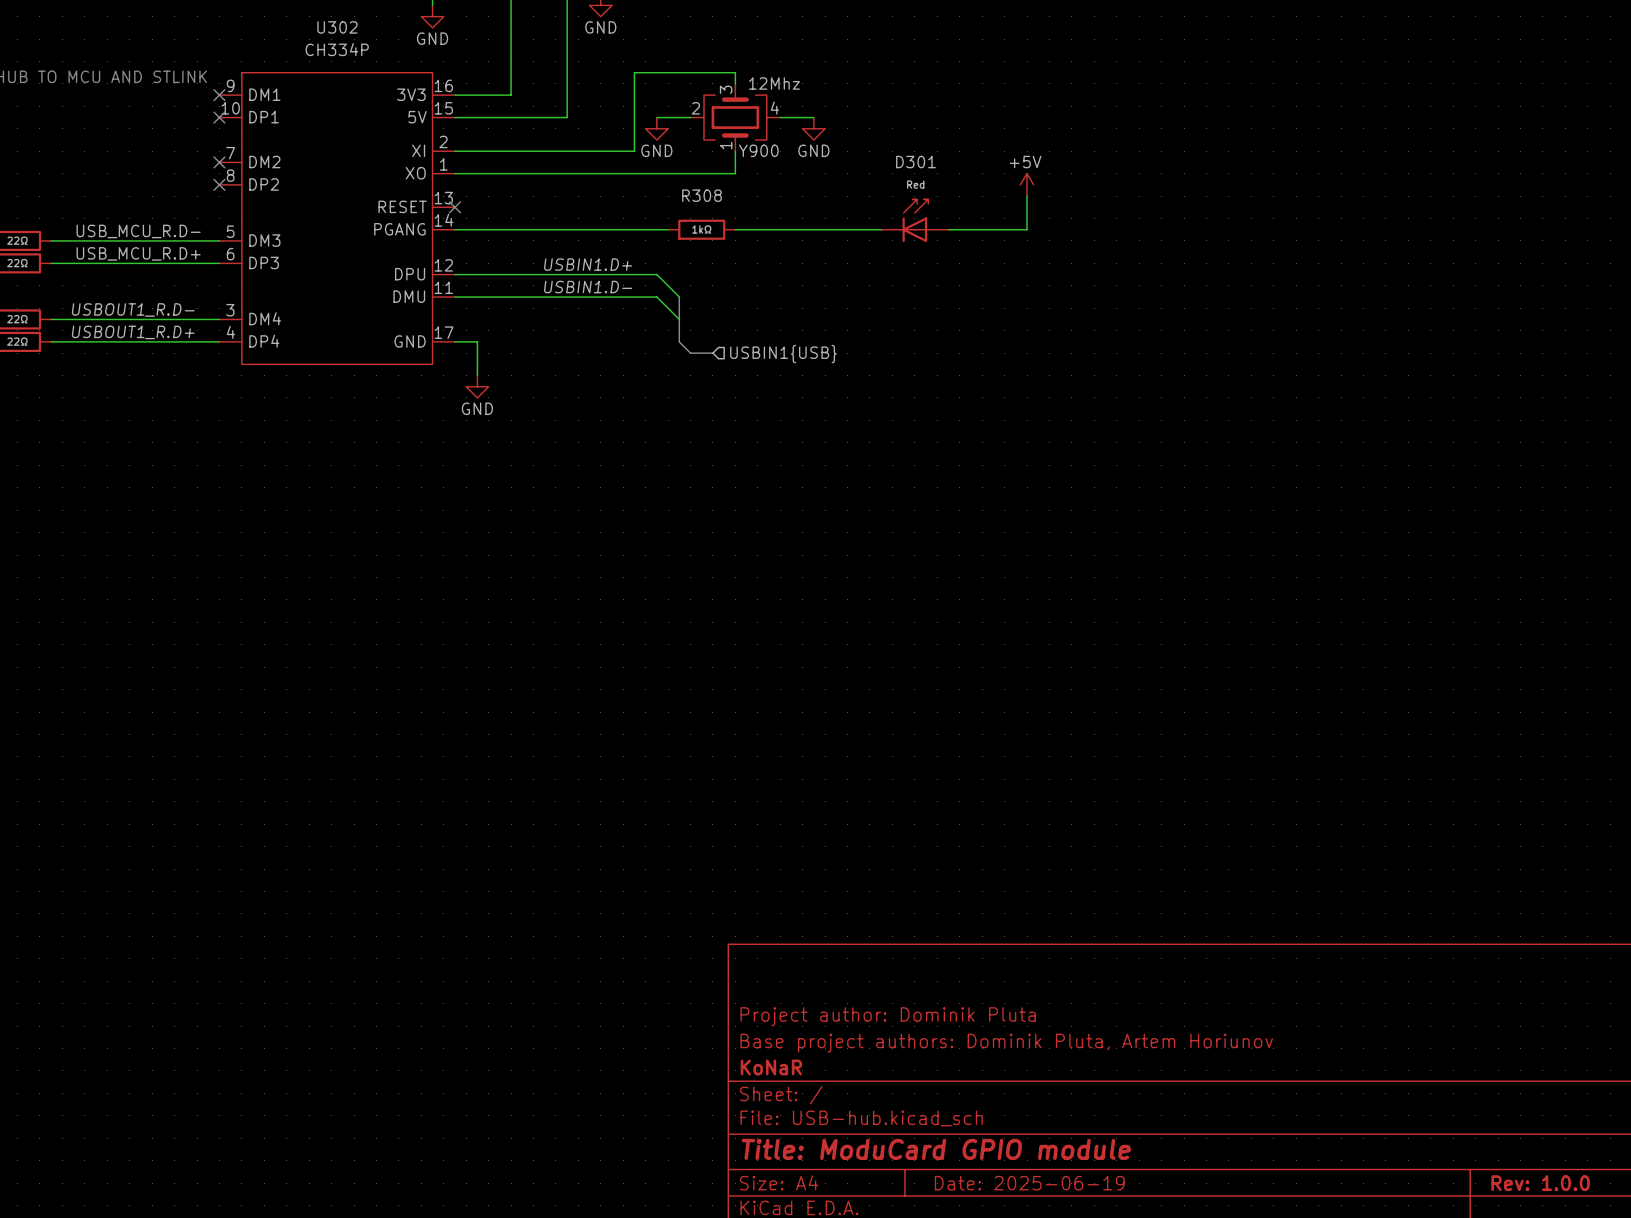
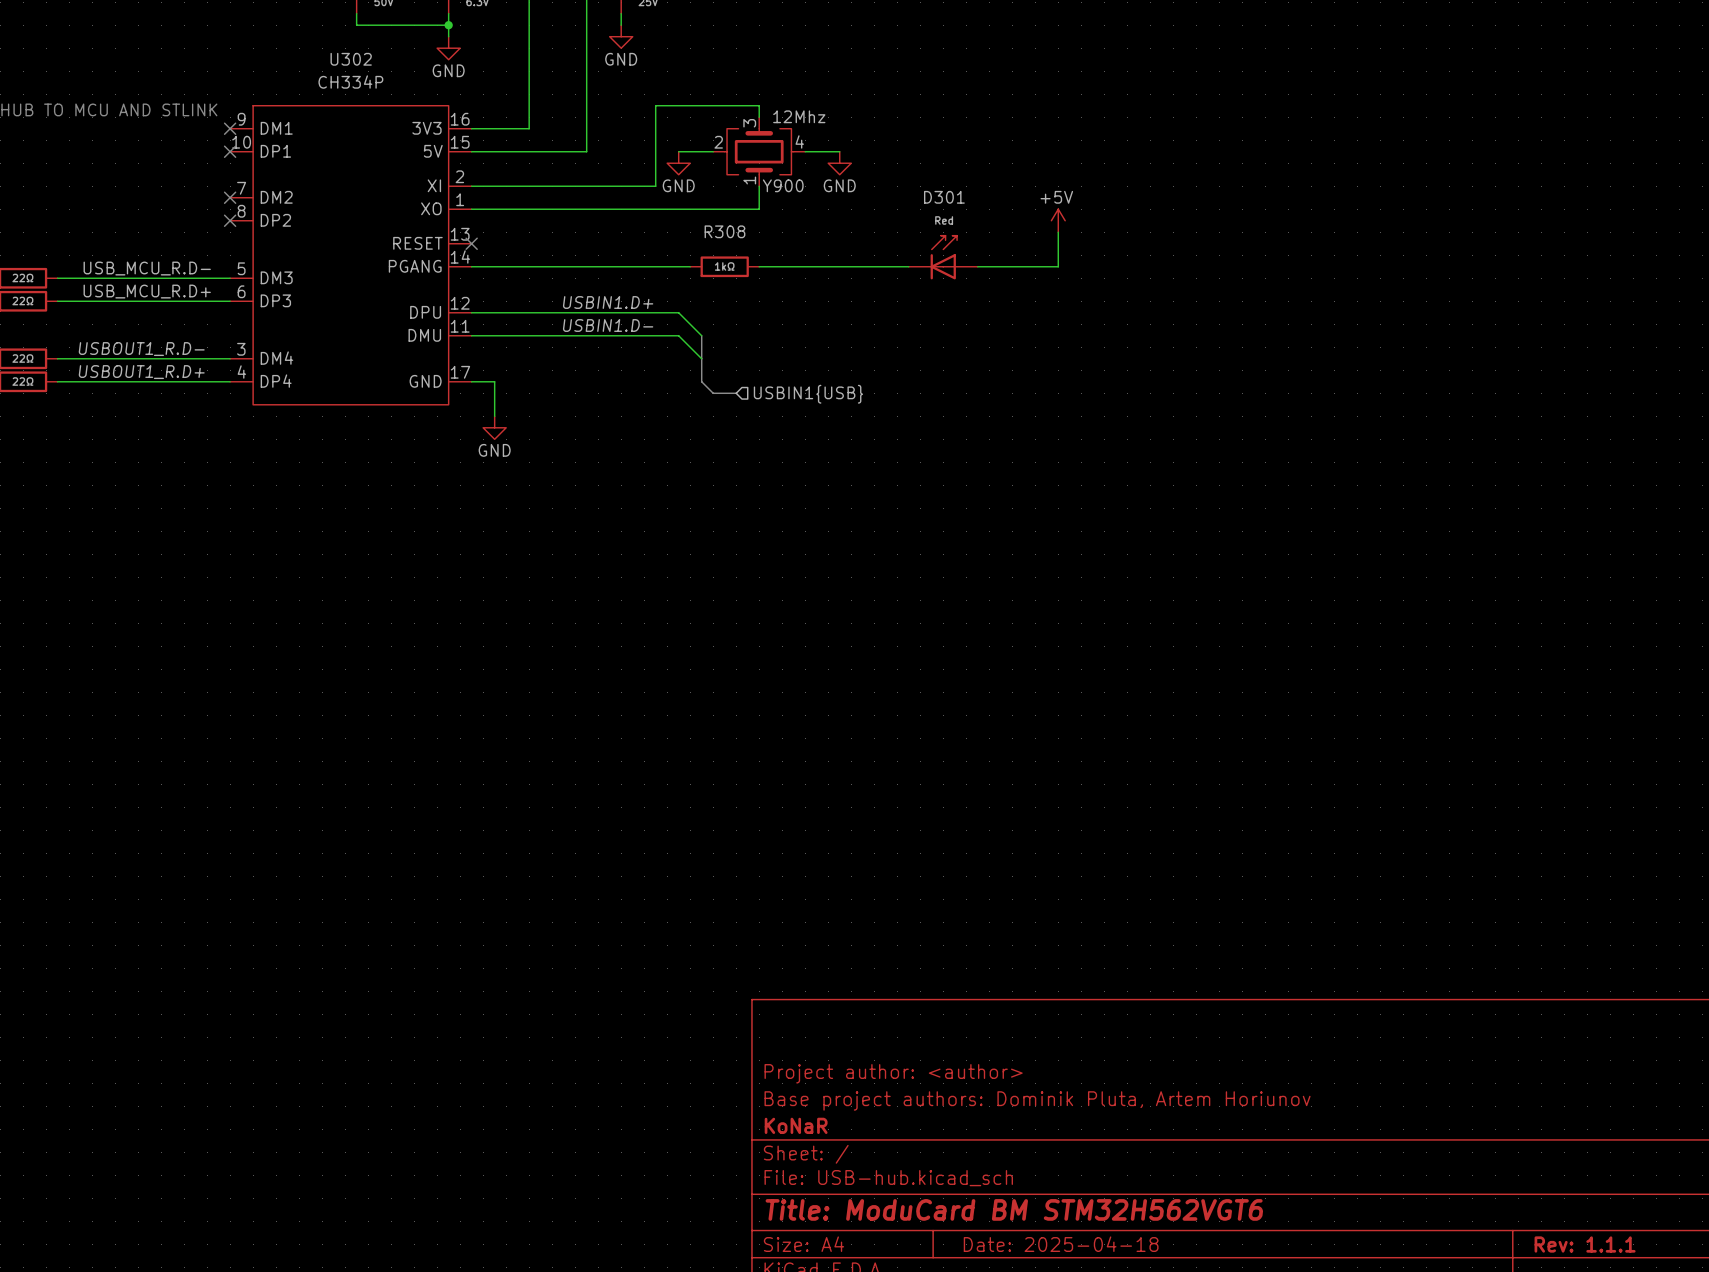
title block: Project author: Dominik Pluta (888, 1016) -> Project author: <author> (893, 1073)
title block: Title: ModuCard GPIO module (936, 1149) -> Title: ModuCard BM STM32H562VGT6 (1014, 1209)
title block: Date: 2025-06-19 (1029, 1183) -> Date: 2025-04-18 (1061, 1244)
title block: Rev: 1.0.0 (1540, 1183) -> Rev: 1.1.1 (1585, 1244)

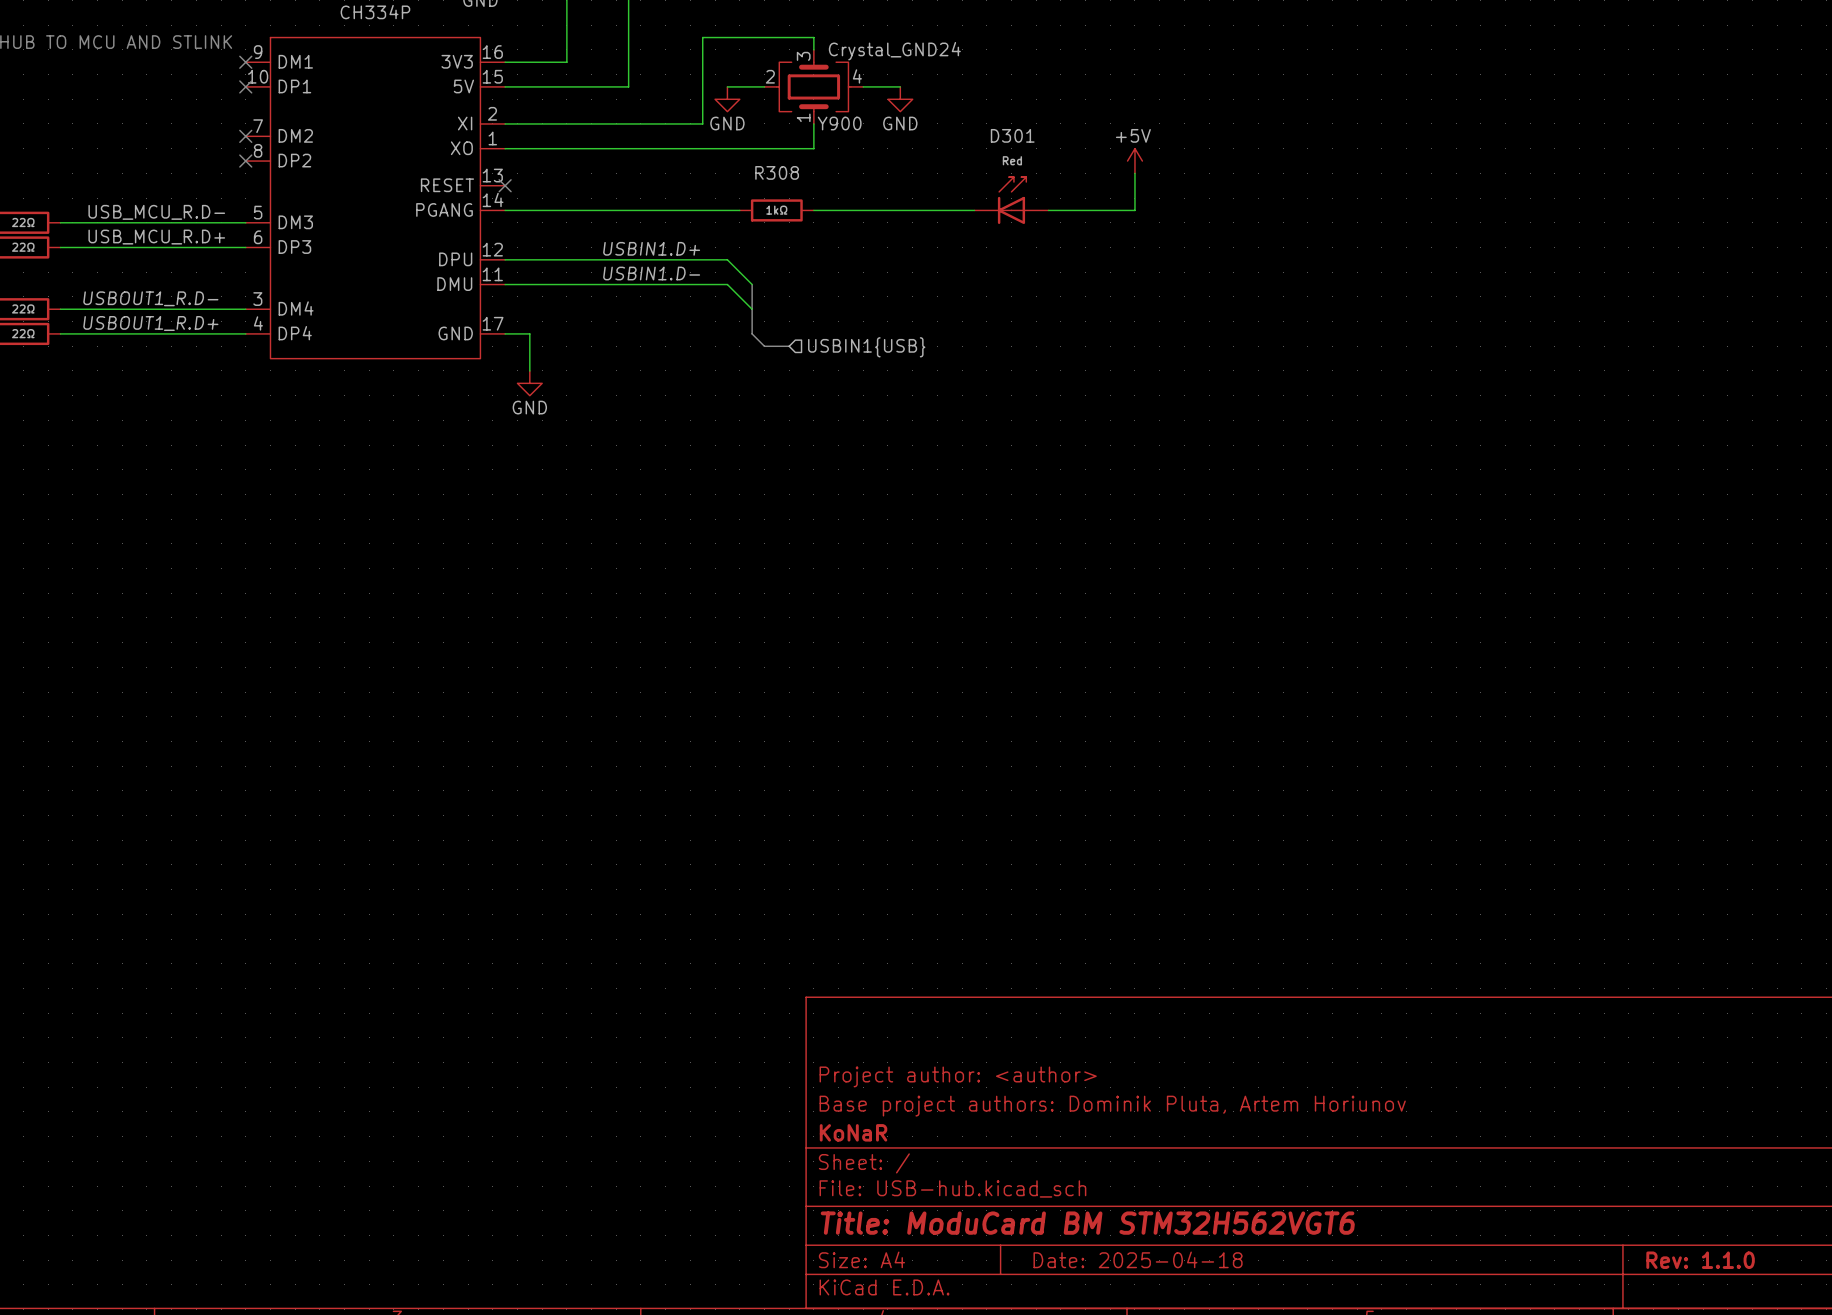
Y900 value: 12Mhz (799, 116) -> Crystal_GND24 (894, 51)
title block: Rev: 1.1.1 (1585, 1244) -> Rev: 1.1.0 (1700, 1260)

